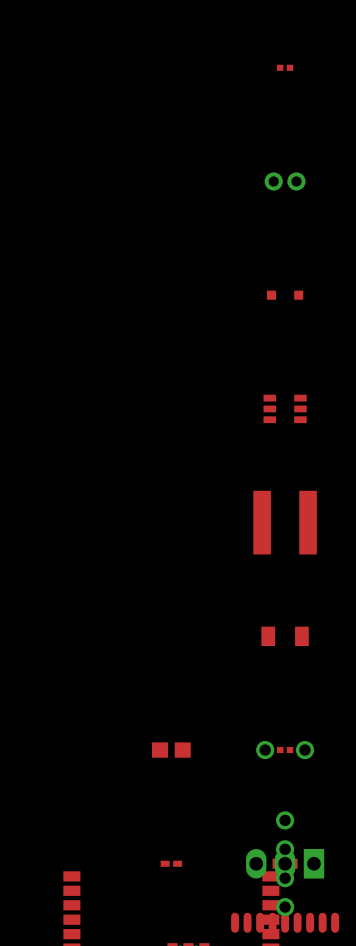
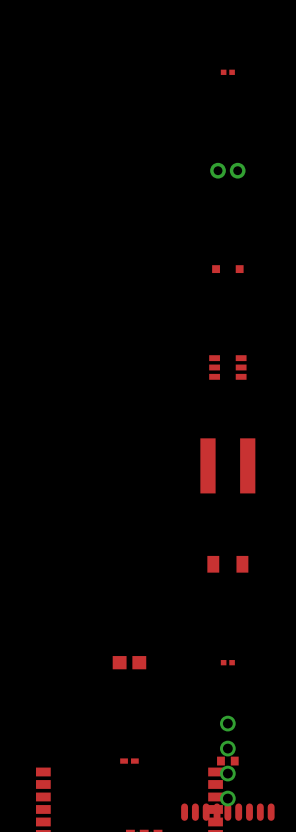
part: (285, 750) -> none
part: (285, 863) -> none

